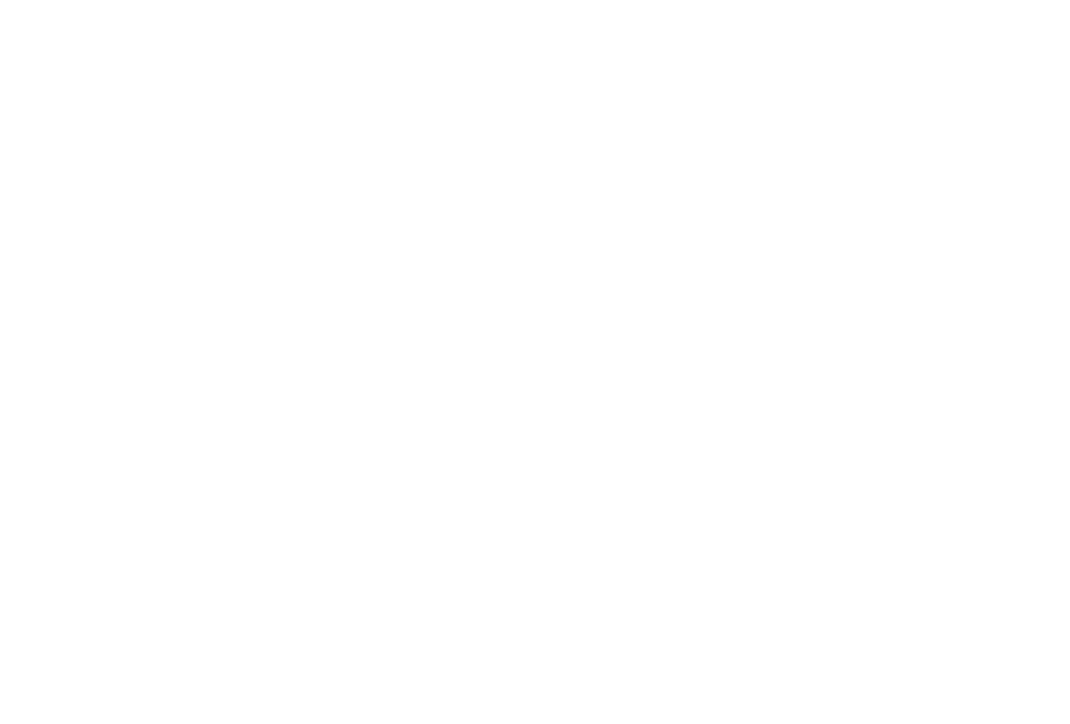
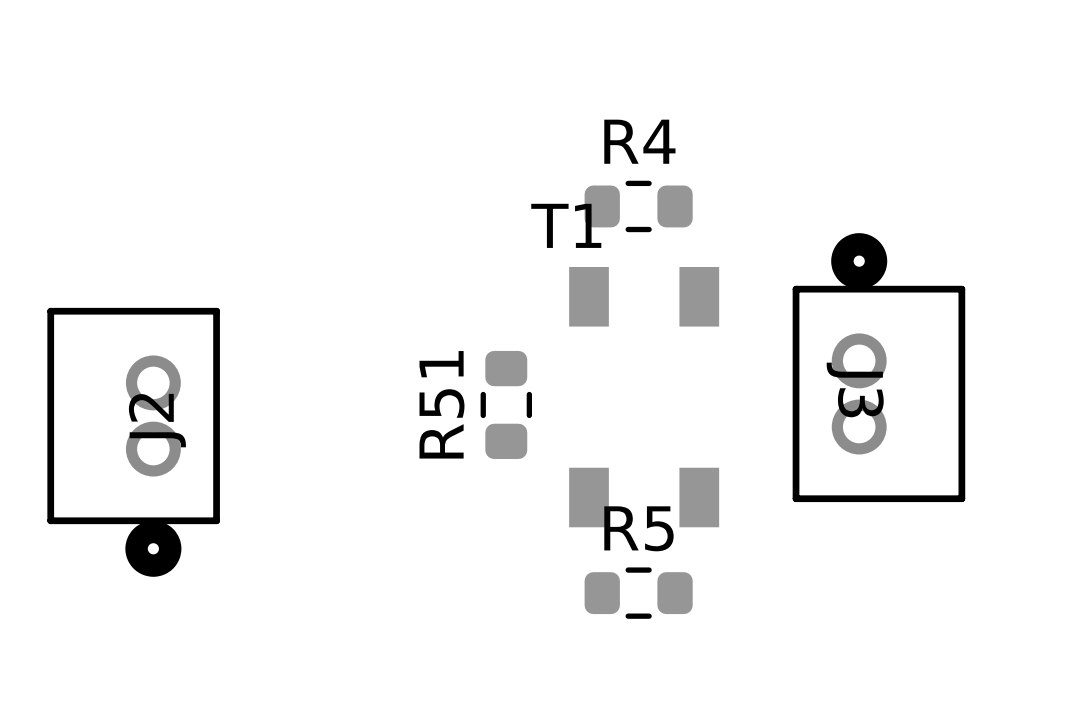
R4: none -> (638, 206)
J3: none -> (878, 367)
T1: none -> (644, 397)
R51: none -> (506, 404)
J2: none -> (133, 442)
R5: none -> (638, 593)

